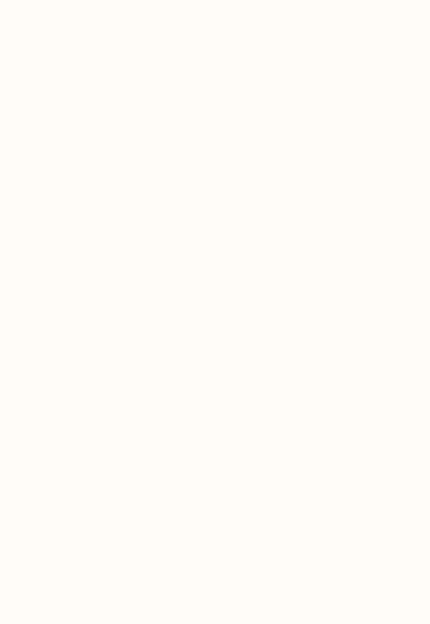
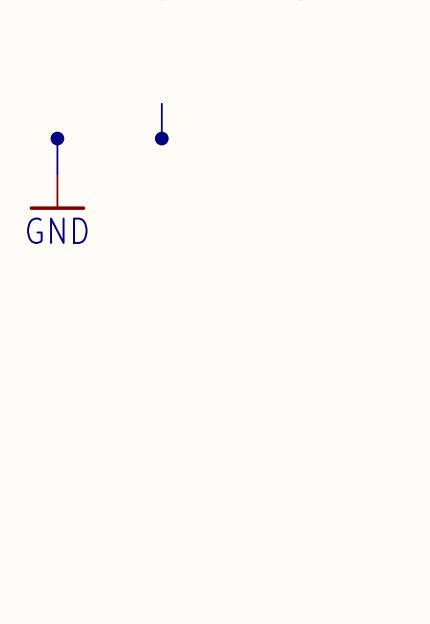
wire: none -> (161, 103) (161, 138)
wire: none -> (57, 138) (57, 173)
junction: none -> (57, 138)
junction: none -> (161, 138)
power symbol: none -> GND (57, 191)

